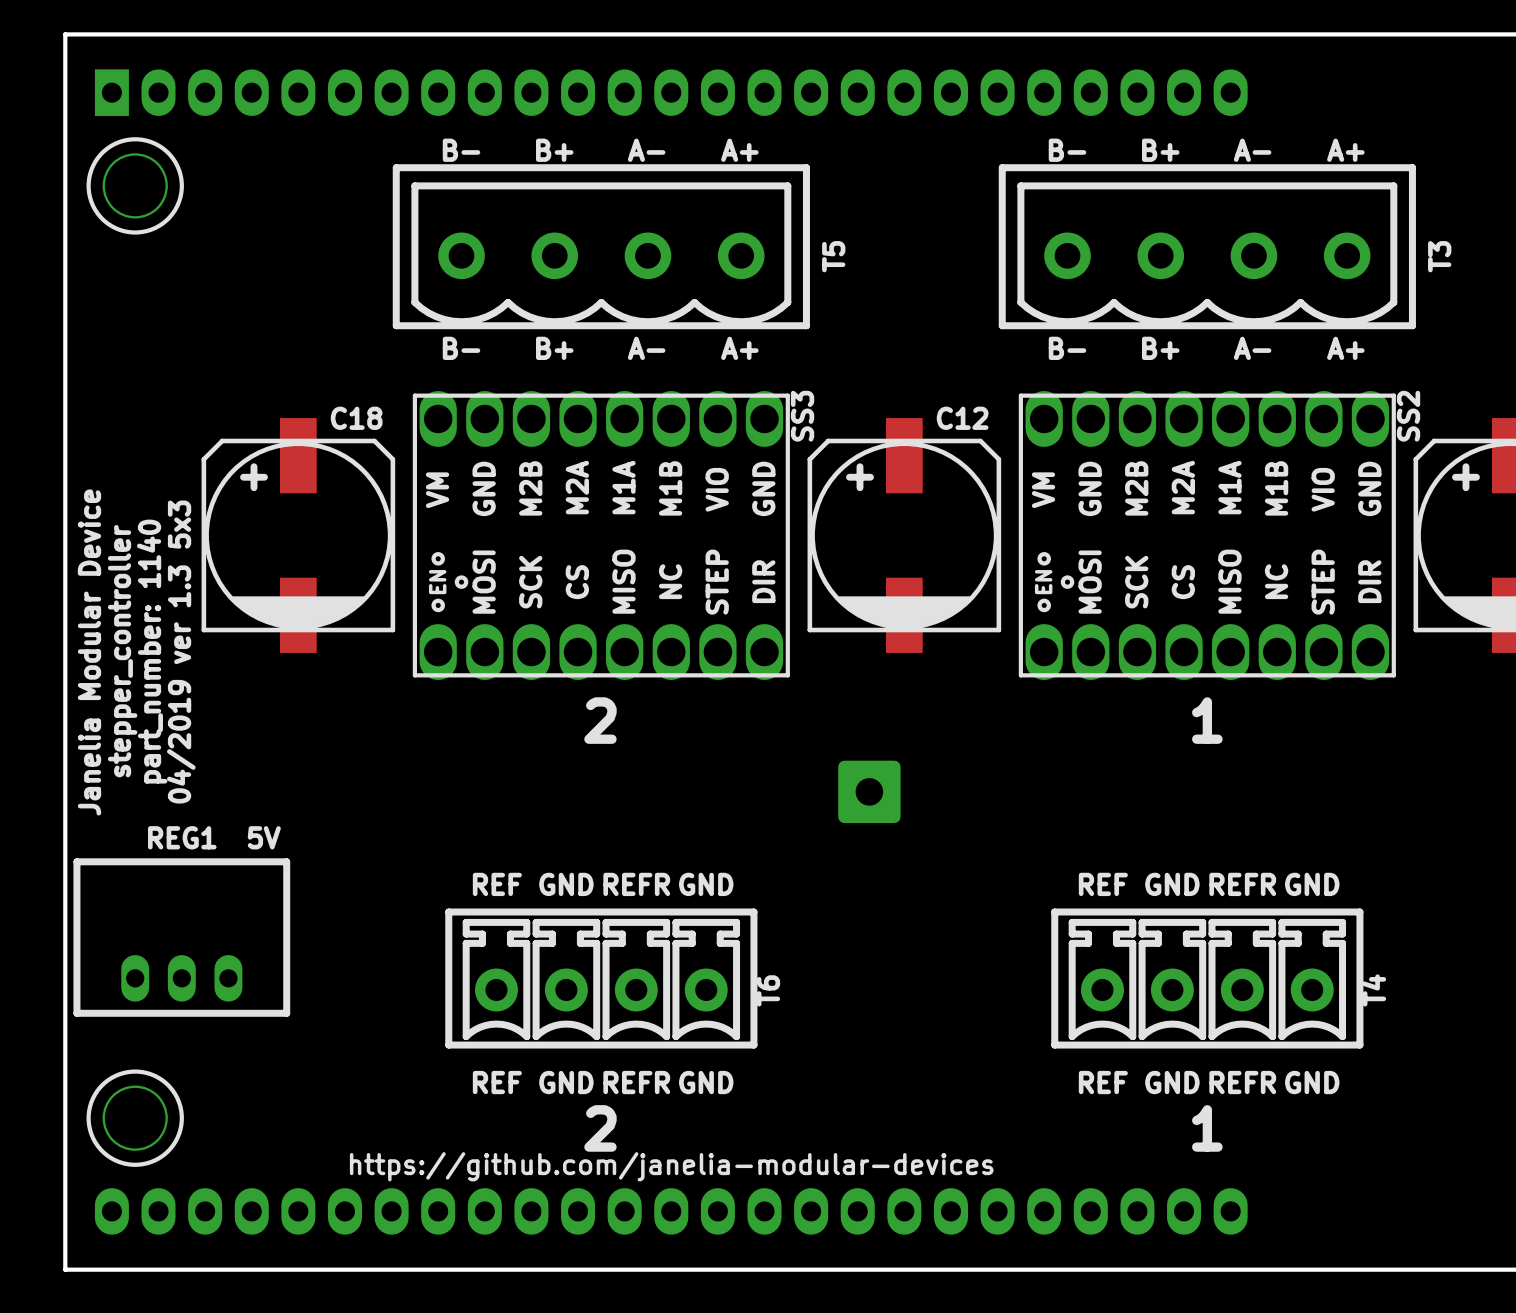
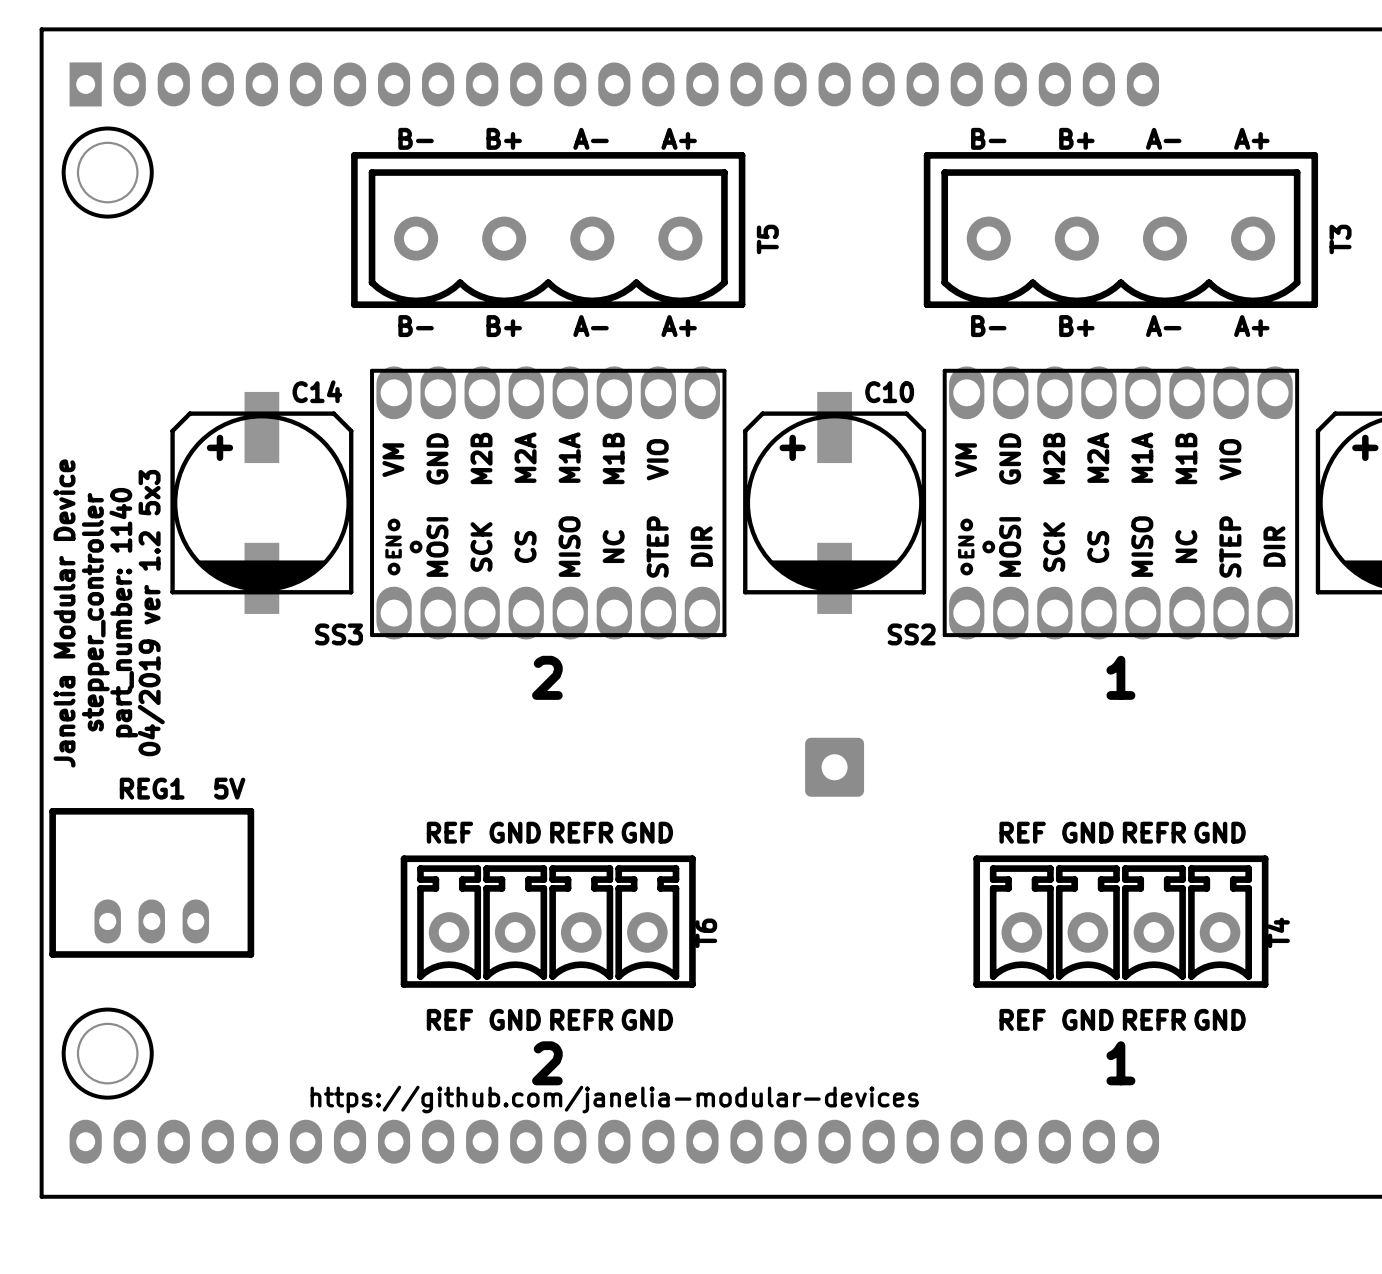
SS3 name rotation: 0° (802, 416) -> 90° clockwise (338, 634)
SS3 name position: SS3 (802, 416) -> SS3 (338, 634)
SS2 name rotation: 0° (1408, 416) -> 90° clockwise (911, 634)
SS2 name position: SS2 (1408, 416) -> SS2 (911, 634)
C18 name: C18 (356, 418) -> C14 (317, 391)
C12 name: C12 (962, 418) -> C10 (889, 392)
SS3 text: GND (763, 488) -> none
SS2 text: GND (1369, 488) -> none
text: 04/2019 ver 1.3 5x3 (181, 652) -> 04/2019 ver 1.2 5x3 (151, 613)
part position: (869, 791) -> (834, 767)

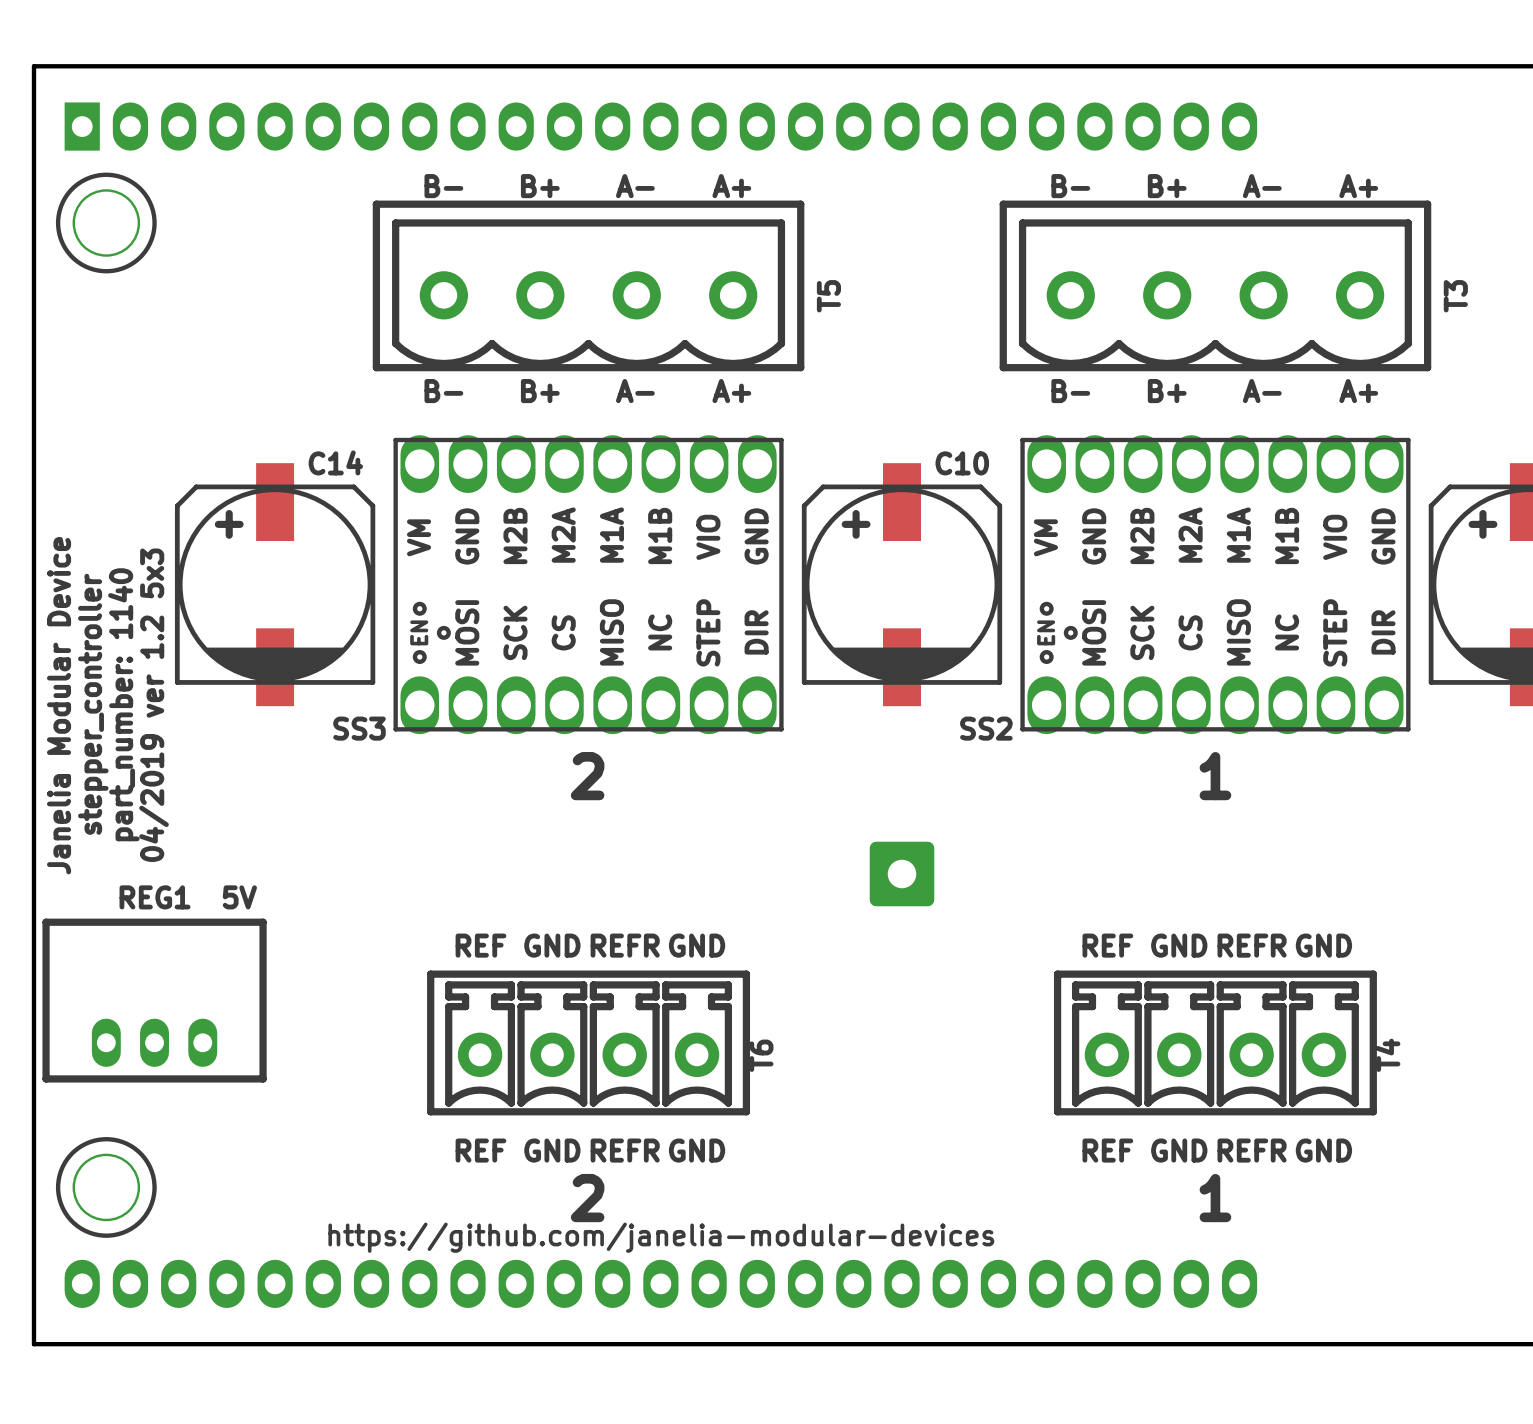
SS3 text: none -> GND (756, 536)
SS2 text: none -> GND (1383, 536)

